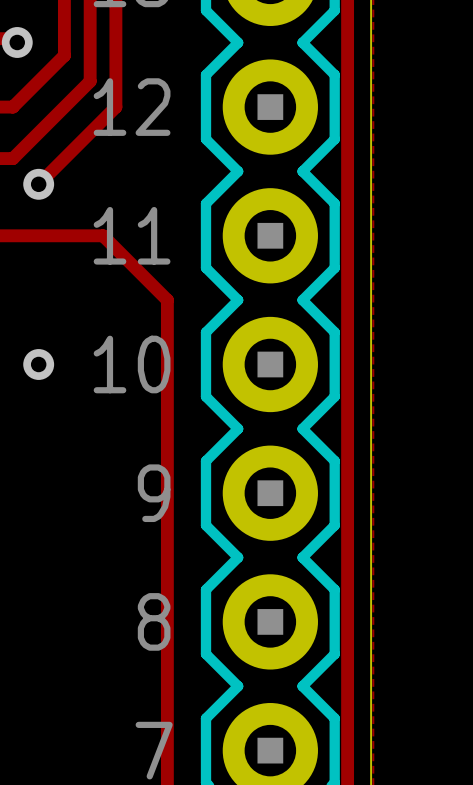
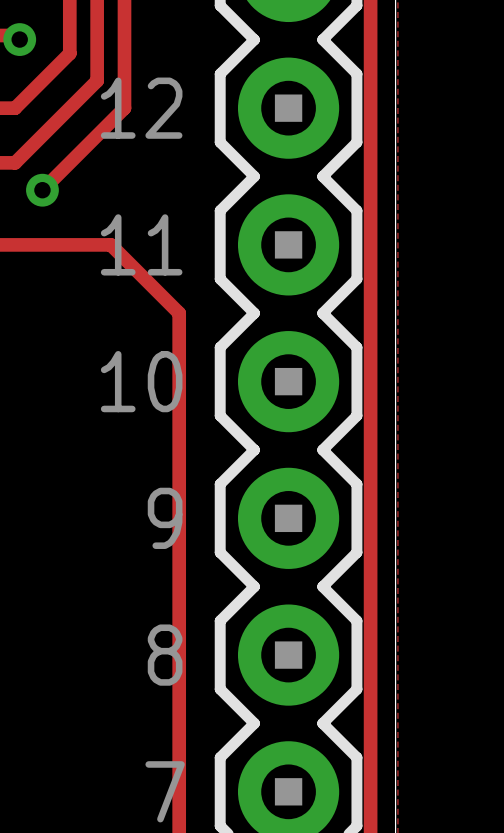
via: (38, 364) -> none

